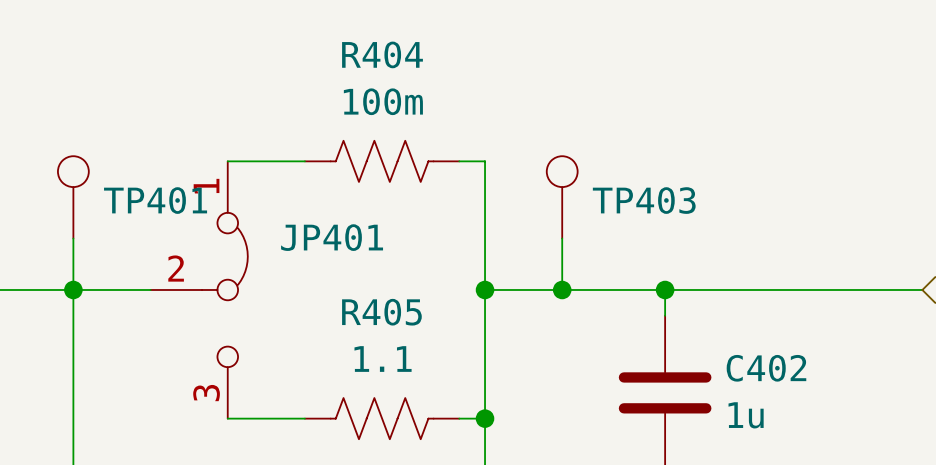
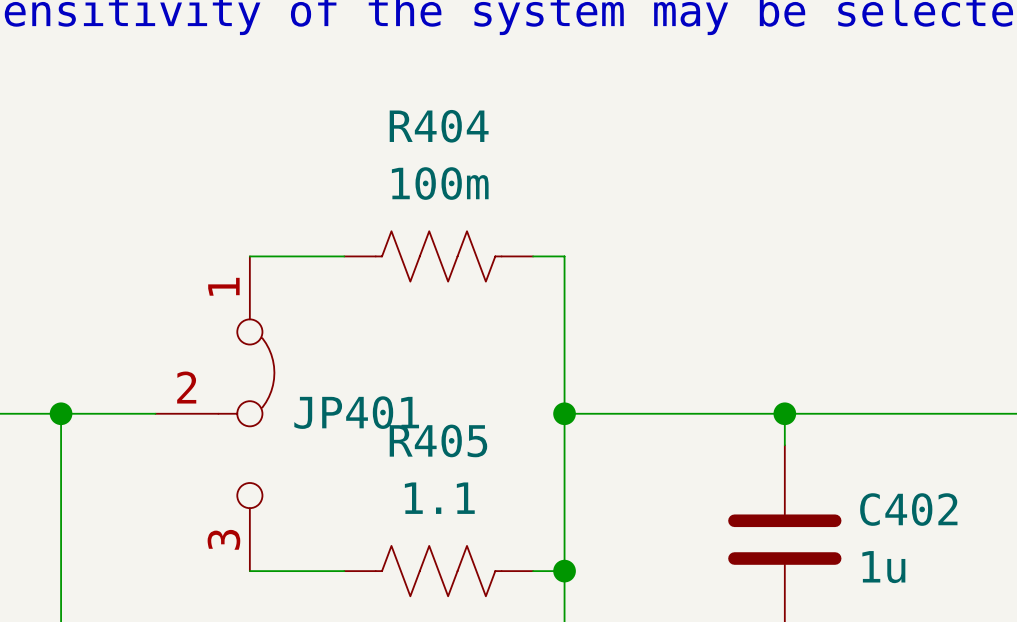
TP401: (73, 197) -> none
TP403: (562, 197) -> none
JP401 name position: JP401 (332, 237) -> JP401 (356, 412)
wire: (73, 238) (73, 289) -> none
wire: (562, 238) (562, 289) -> none
junction: (562, 289) -> none

